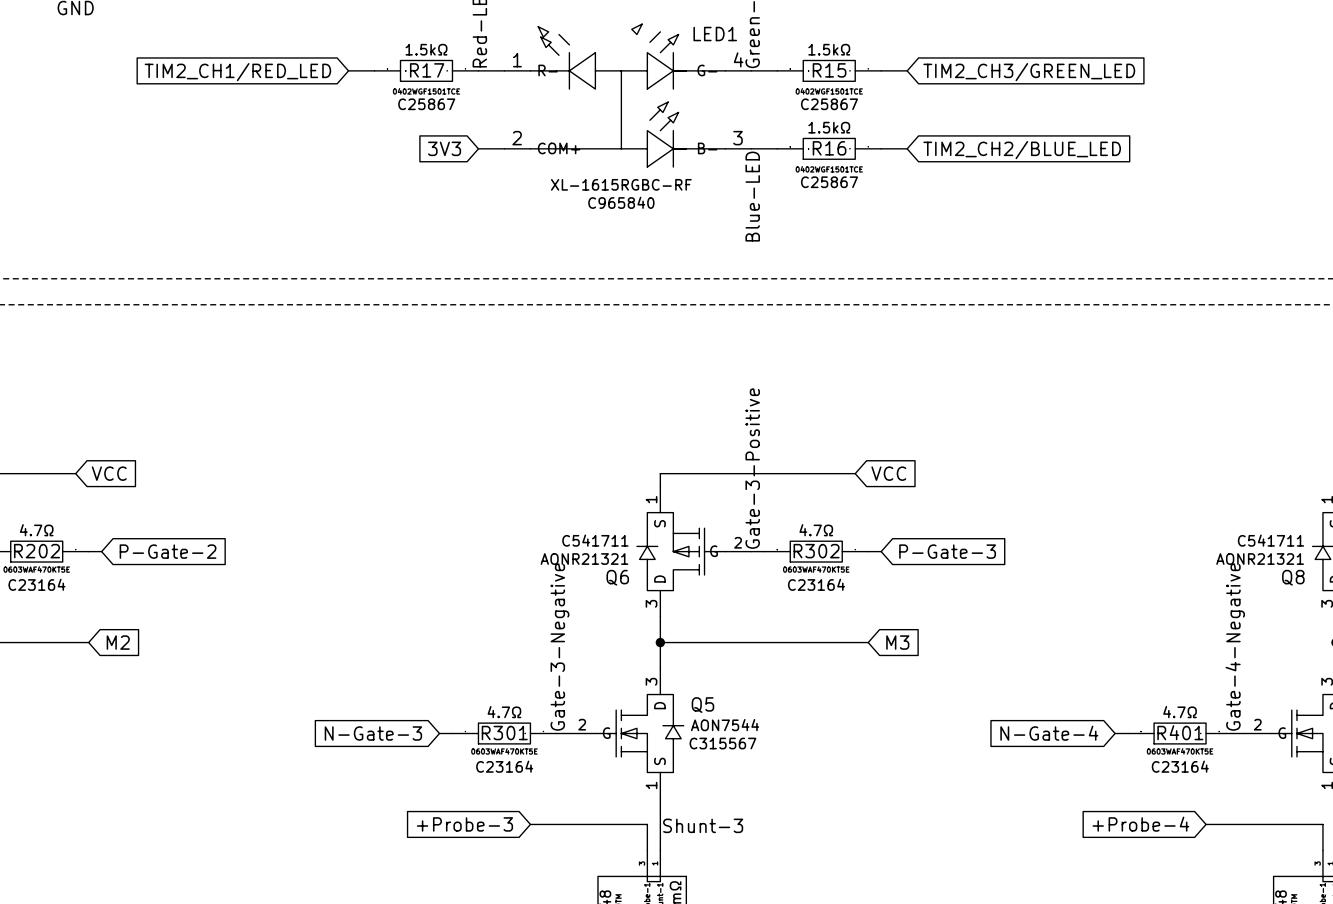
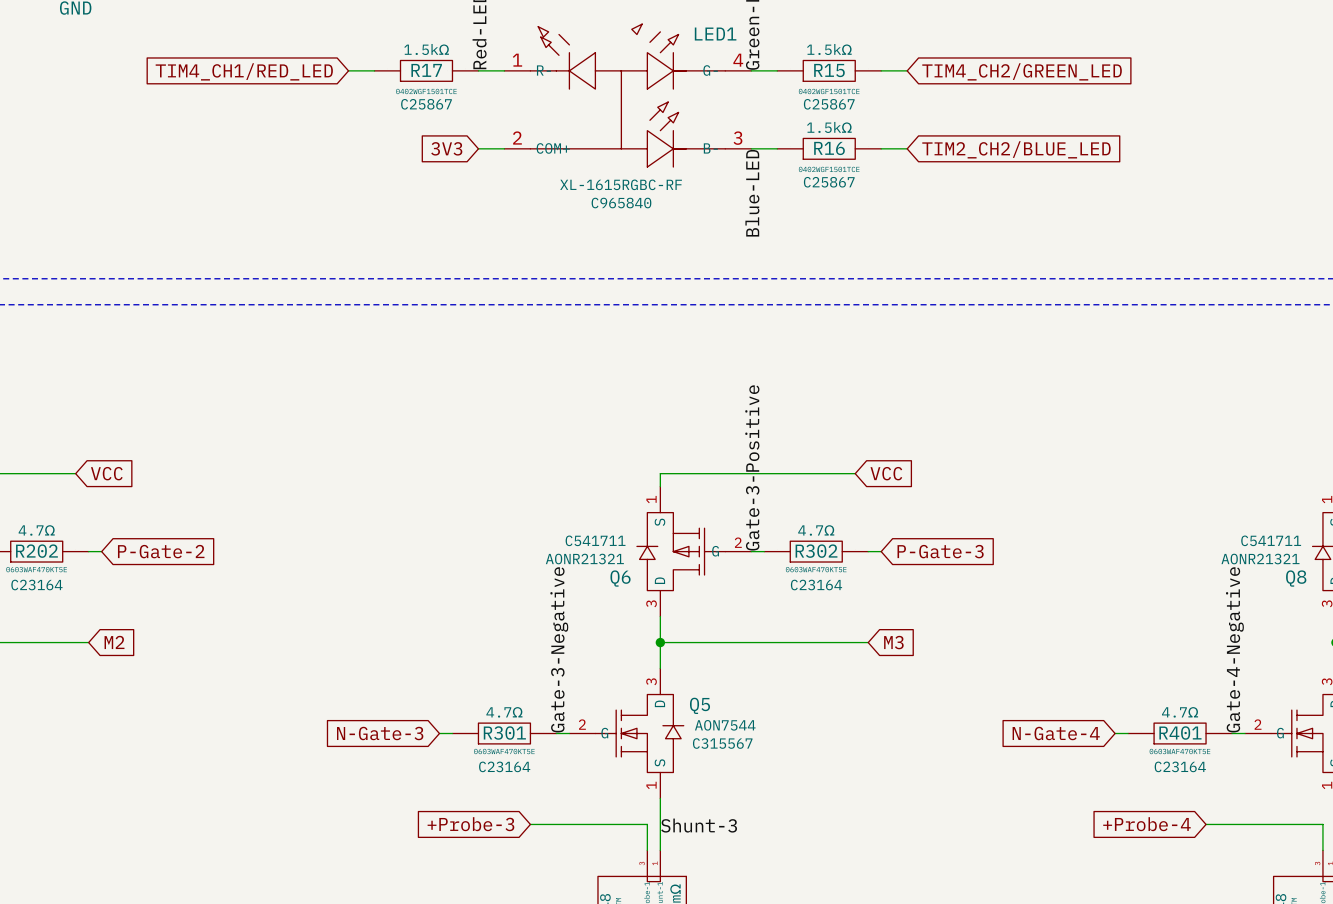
global label: TIM2_CH1/RED_LED (237, 72) -> TIM4_CH1/RED_LED (244, 71)
global label: TIM2_CH3/GREEN_LED (1029, 72) -> TIM4_CH2/GREEN_LED (1022, 71)

